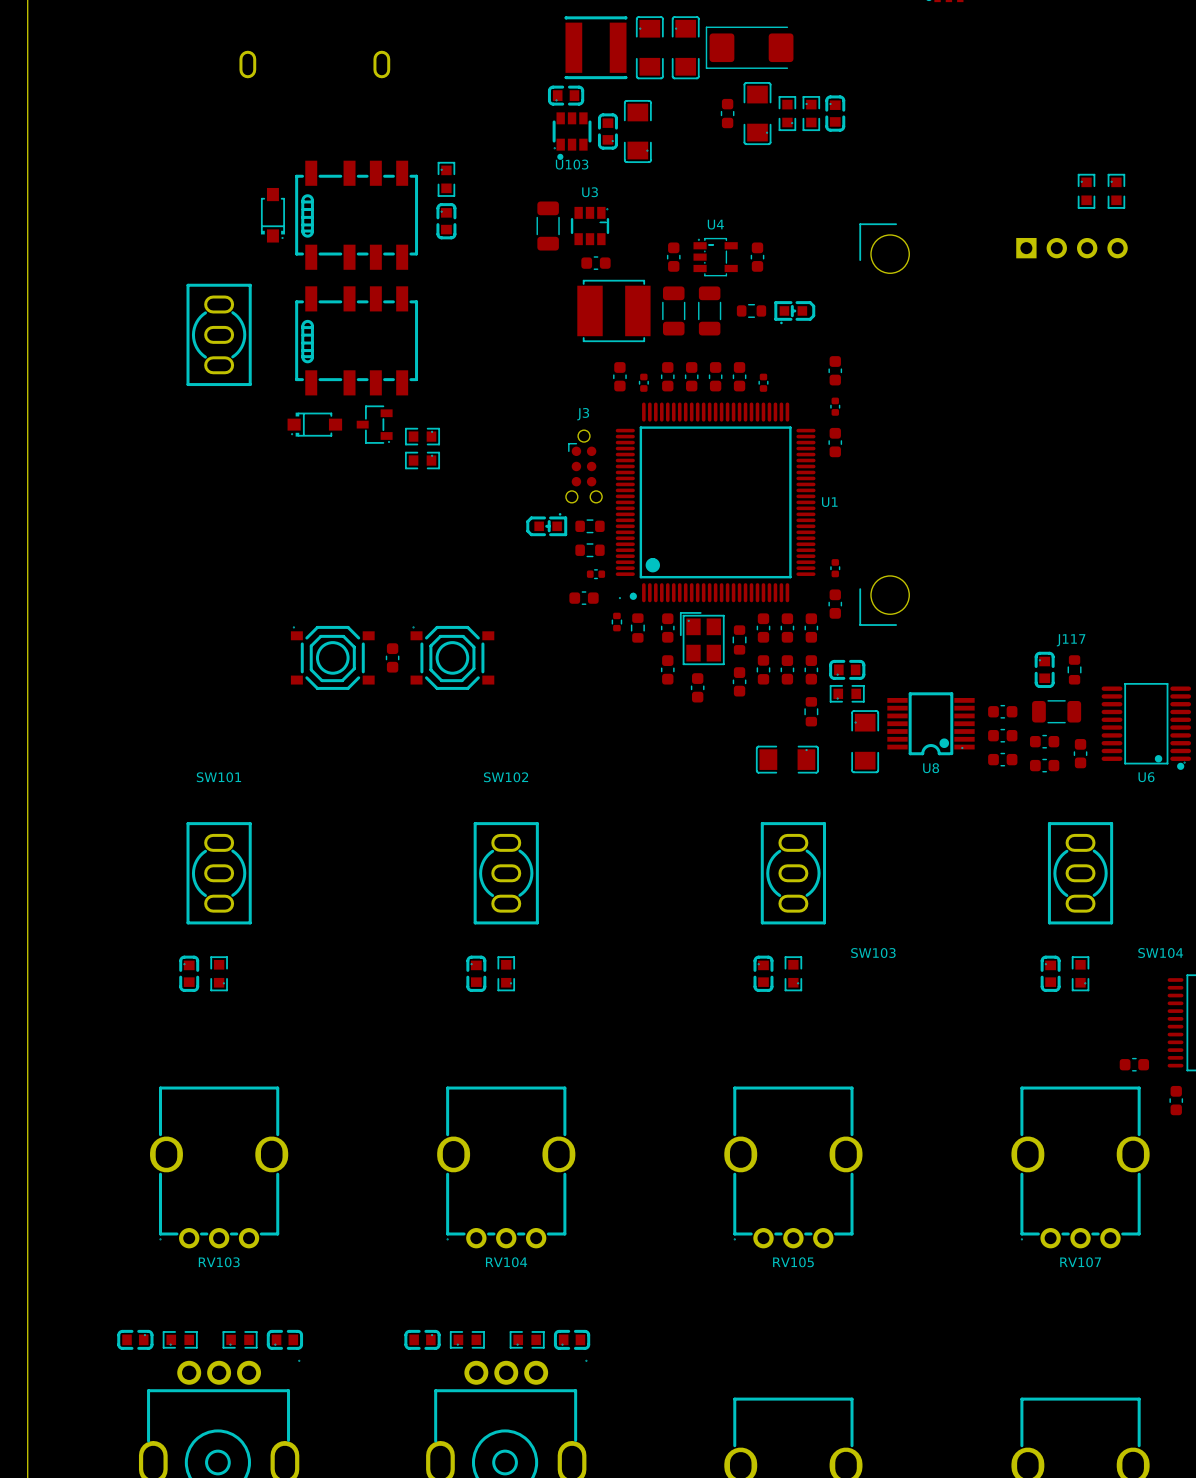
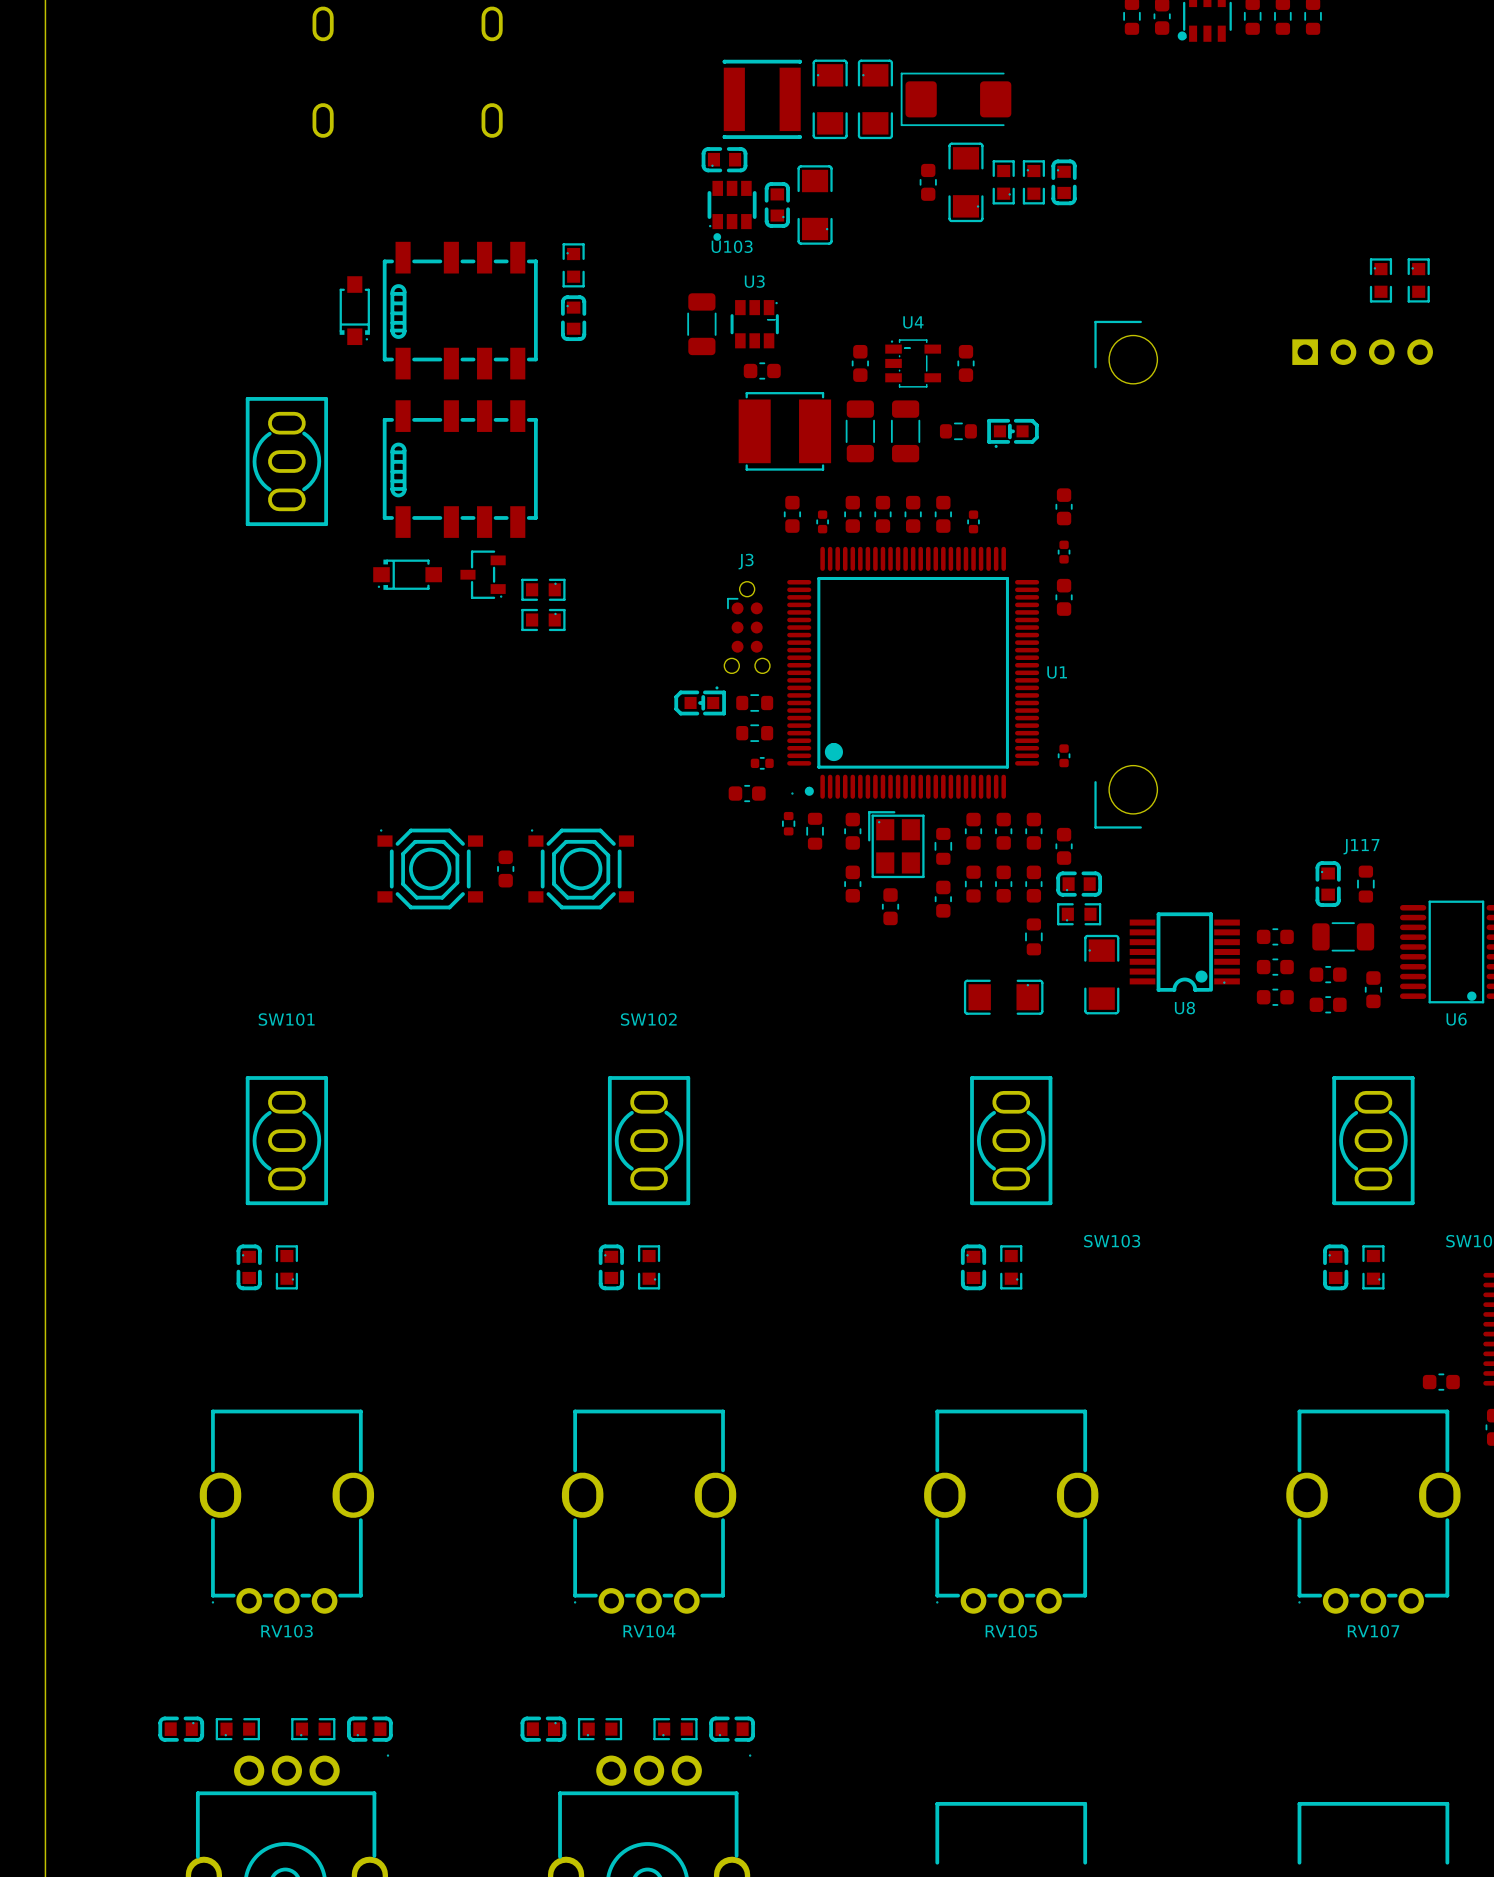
part position: (835, 604) -> (1064, 846)

